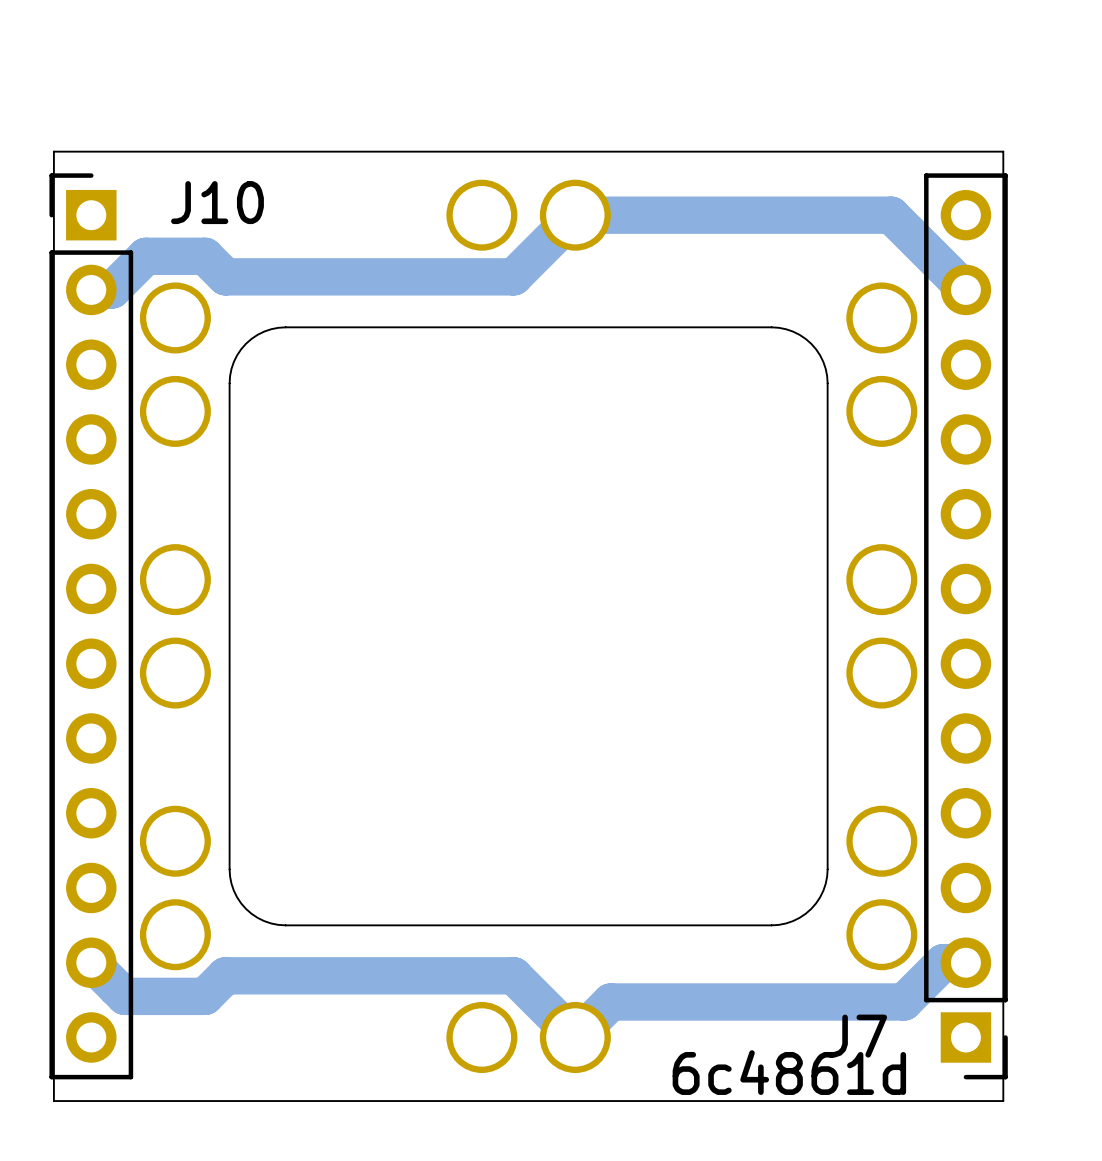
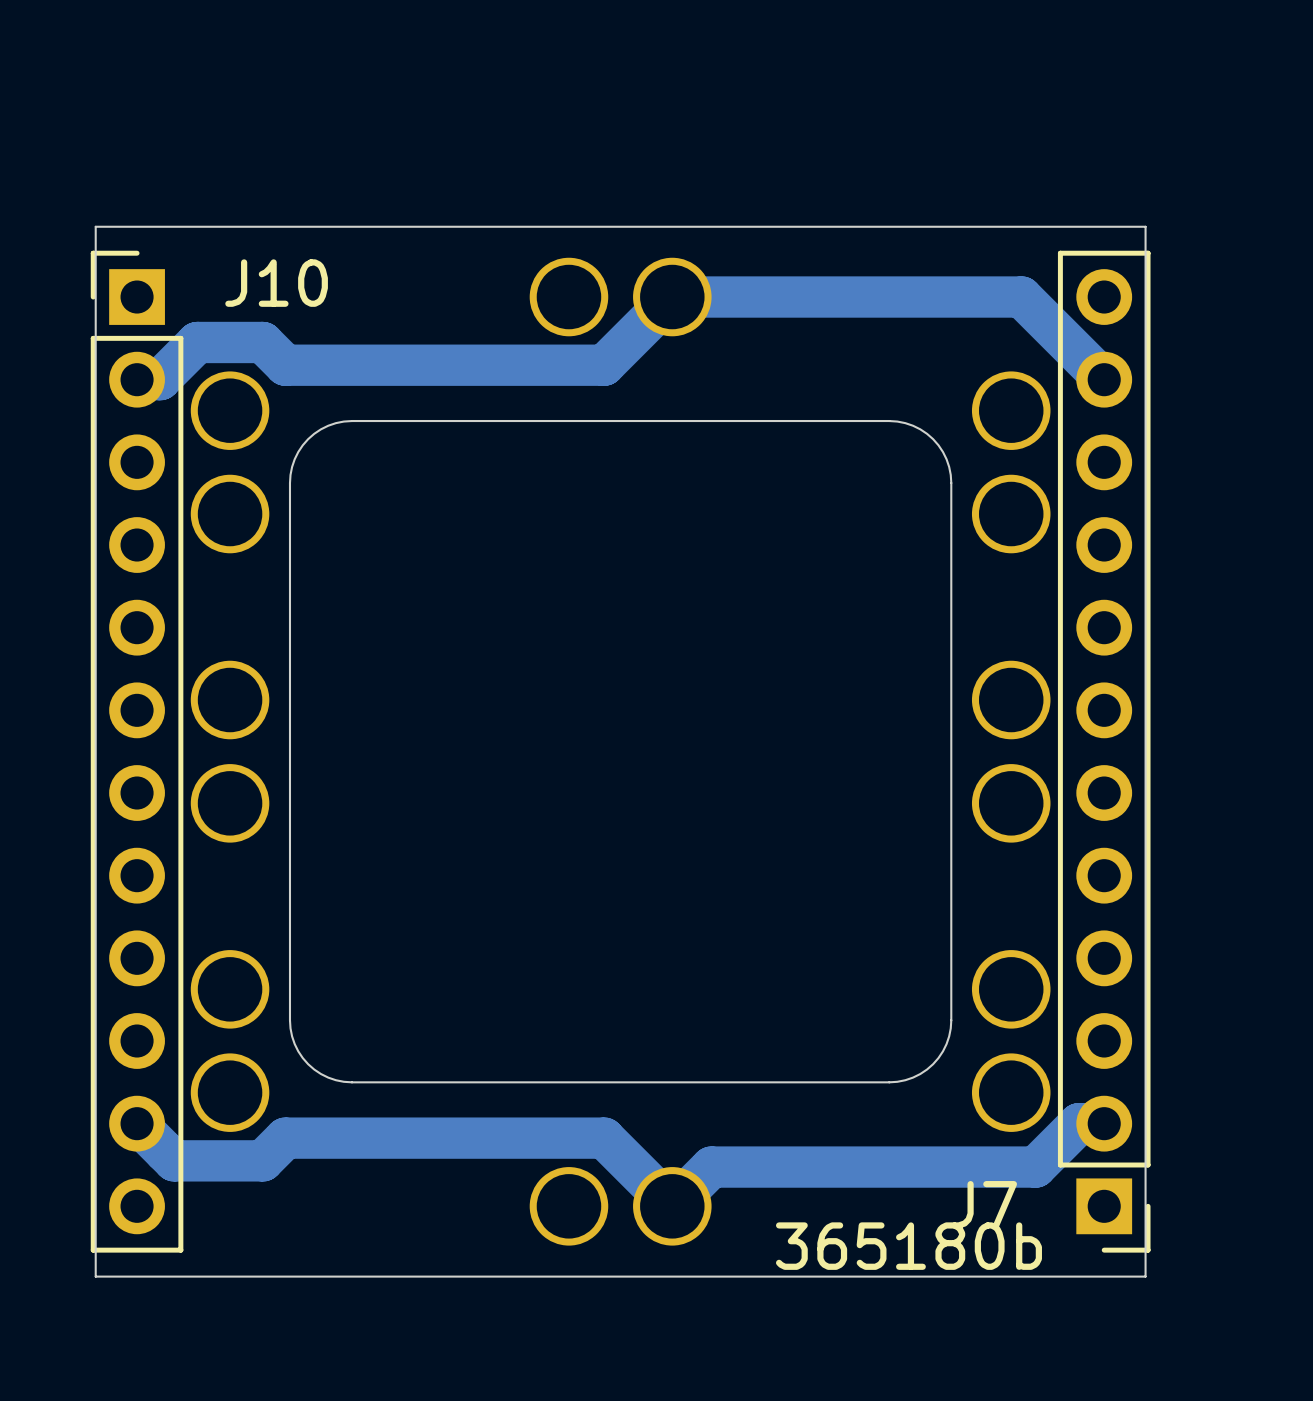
text: 6c4861d (789, 1072) -> 365180b (908, 1246)

